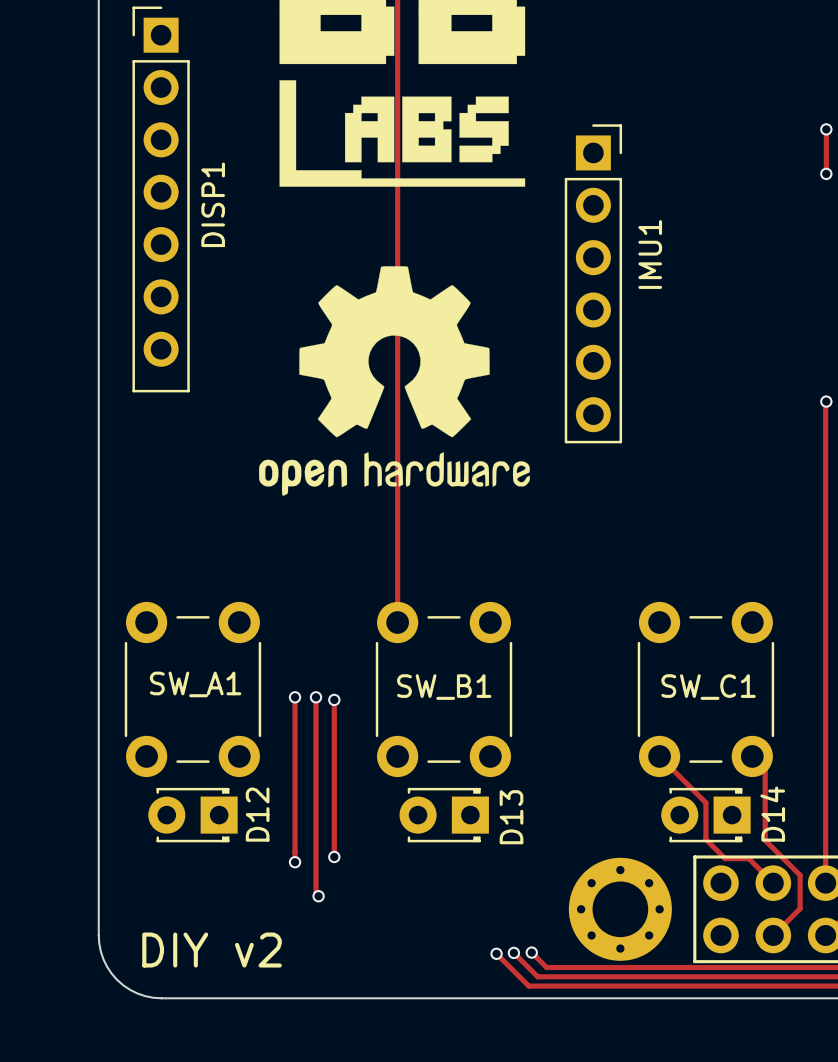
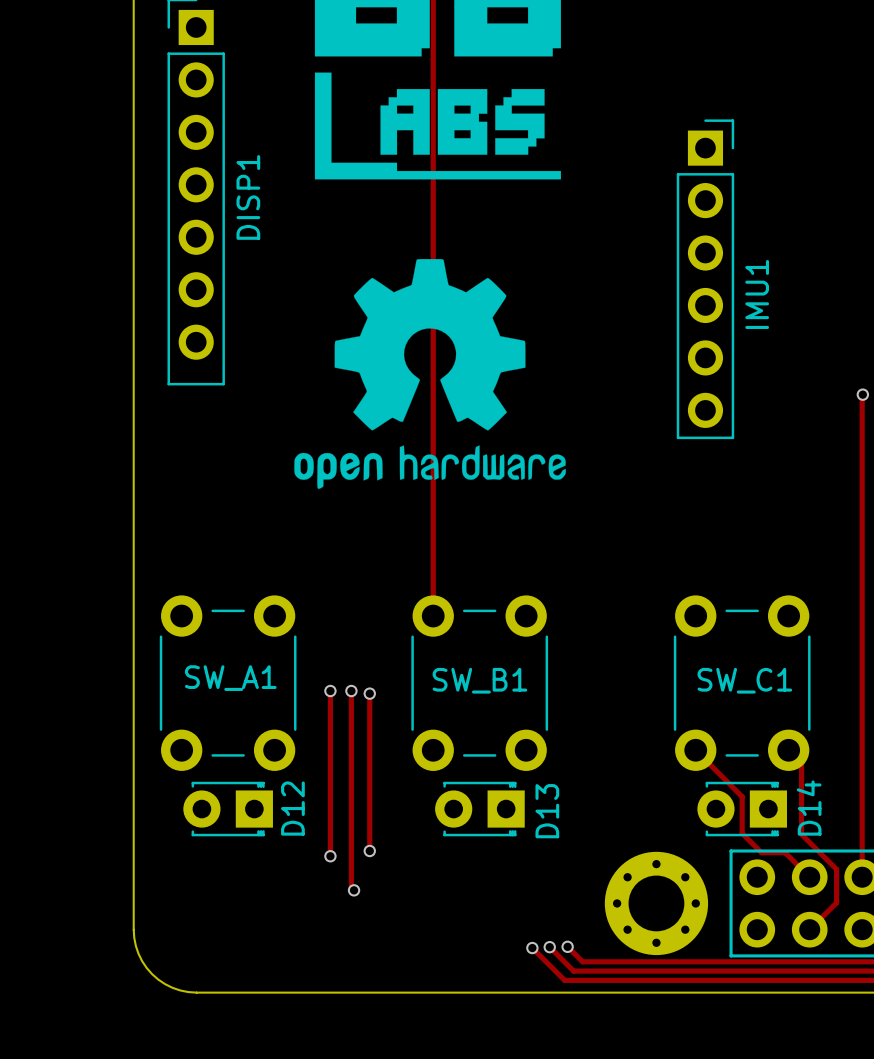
track: (826, 129) (826, 173) -> none
via: (826, 129) -> none
via: (826, 173) -> none
text position: IMU1 (650, 254) -> IMU1 (757, 294)
part position: (593, 283) -> (705, 279)
text: DIY v2 (212, 950) -> none

